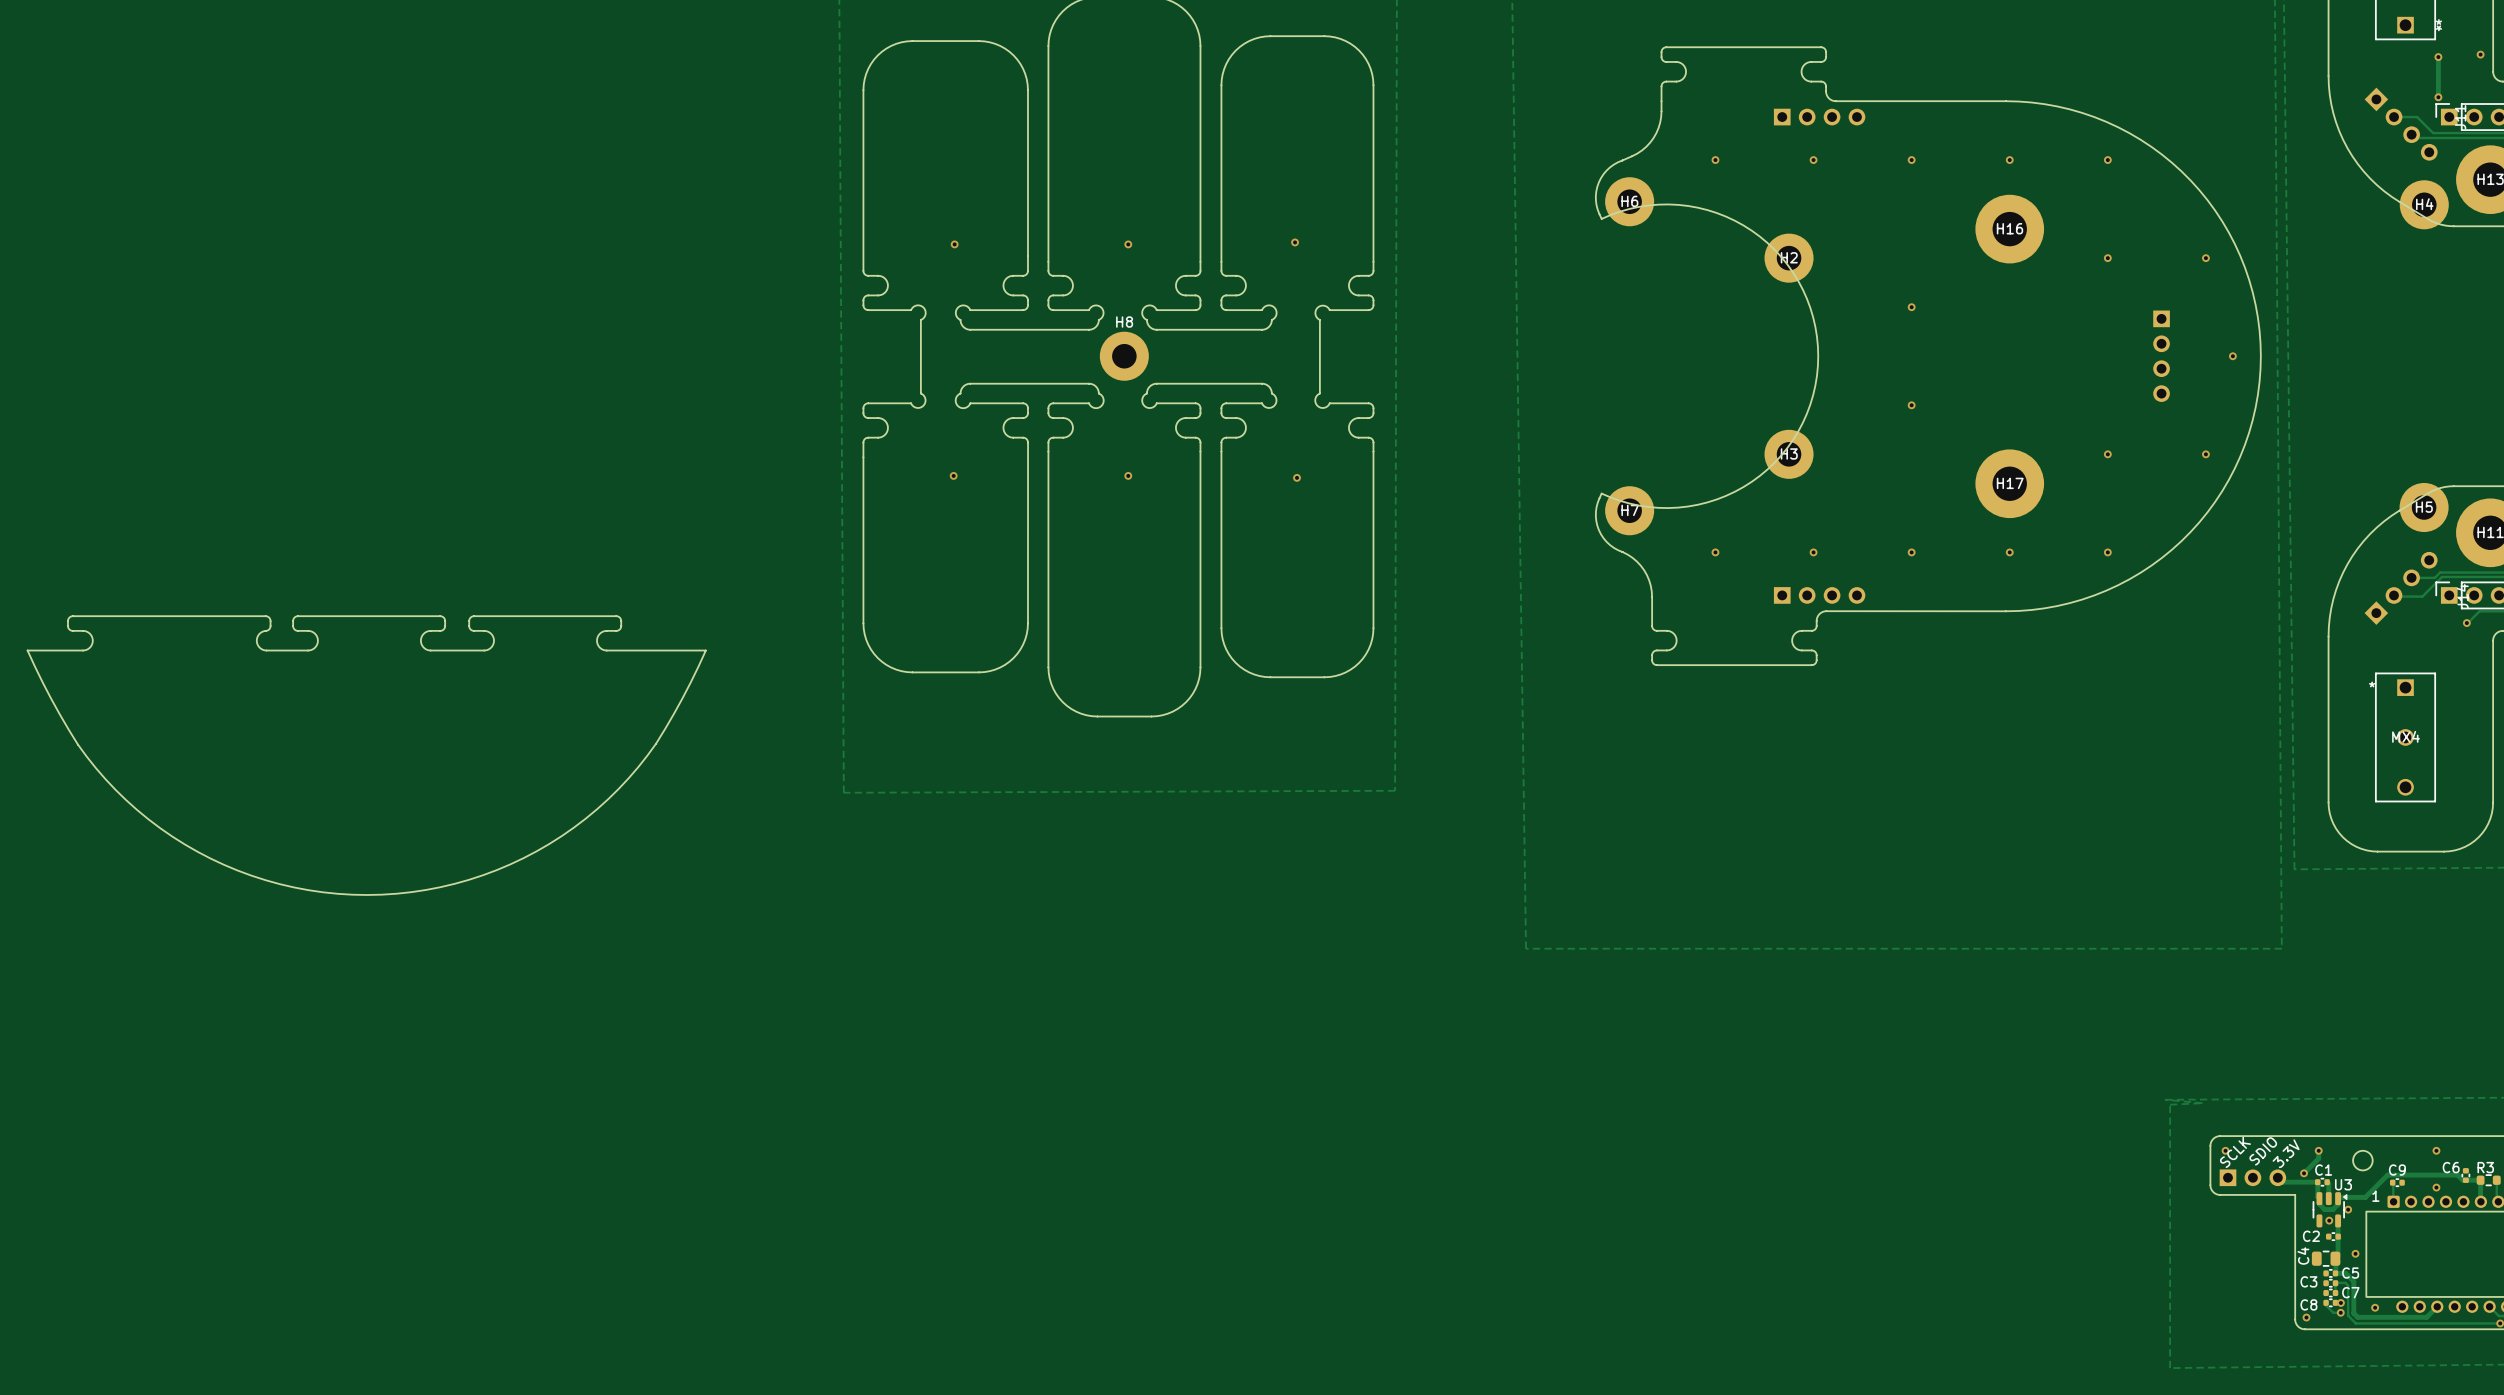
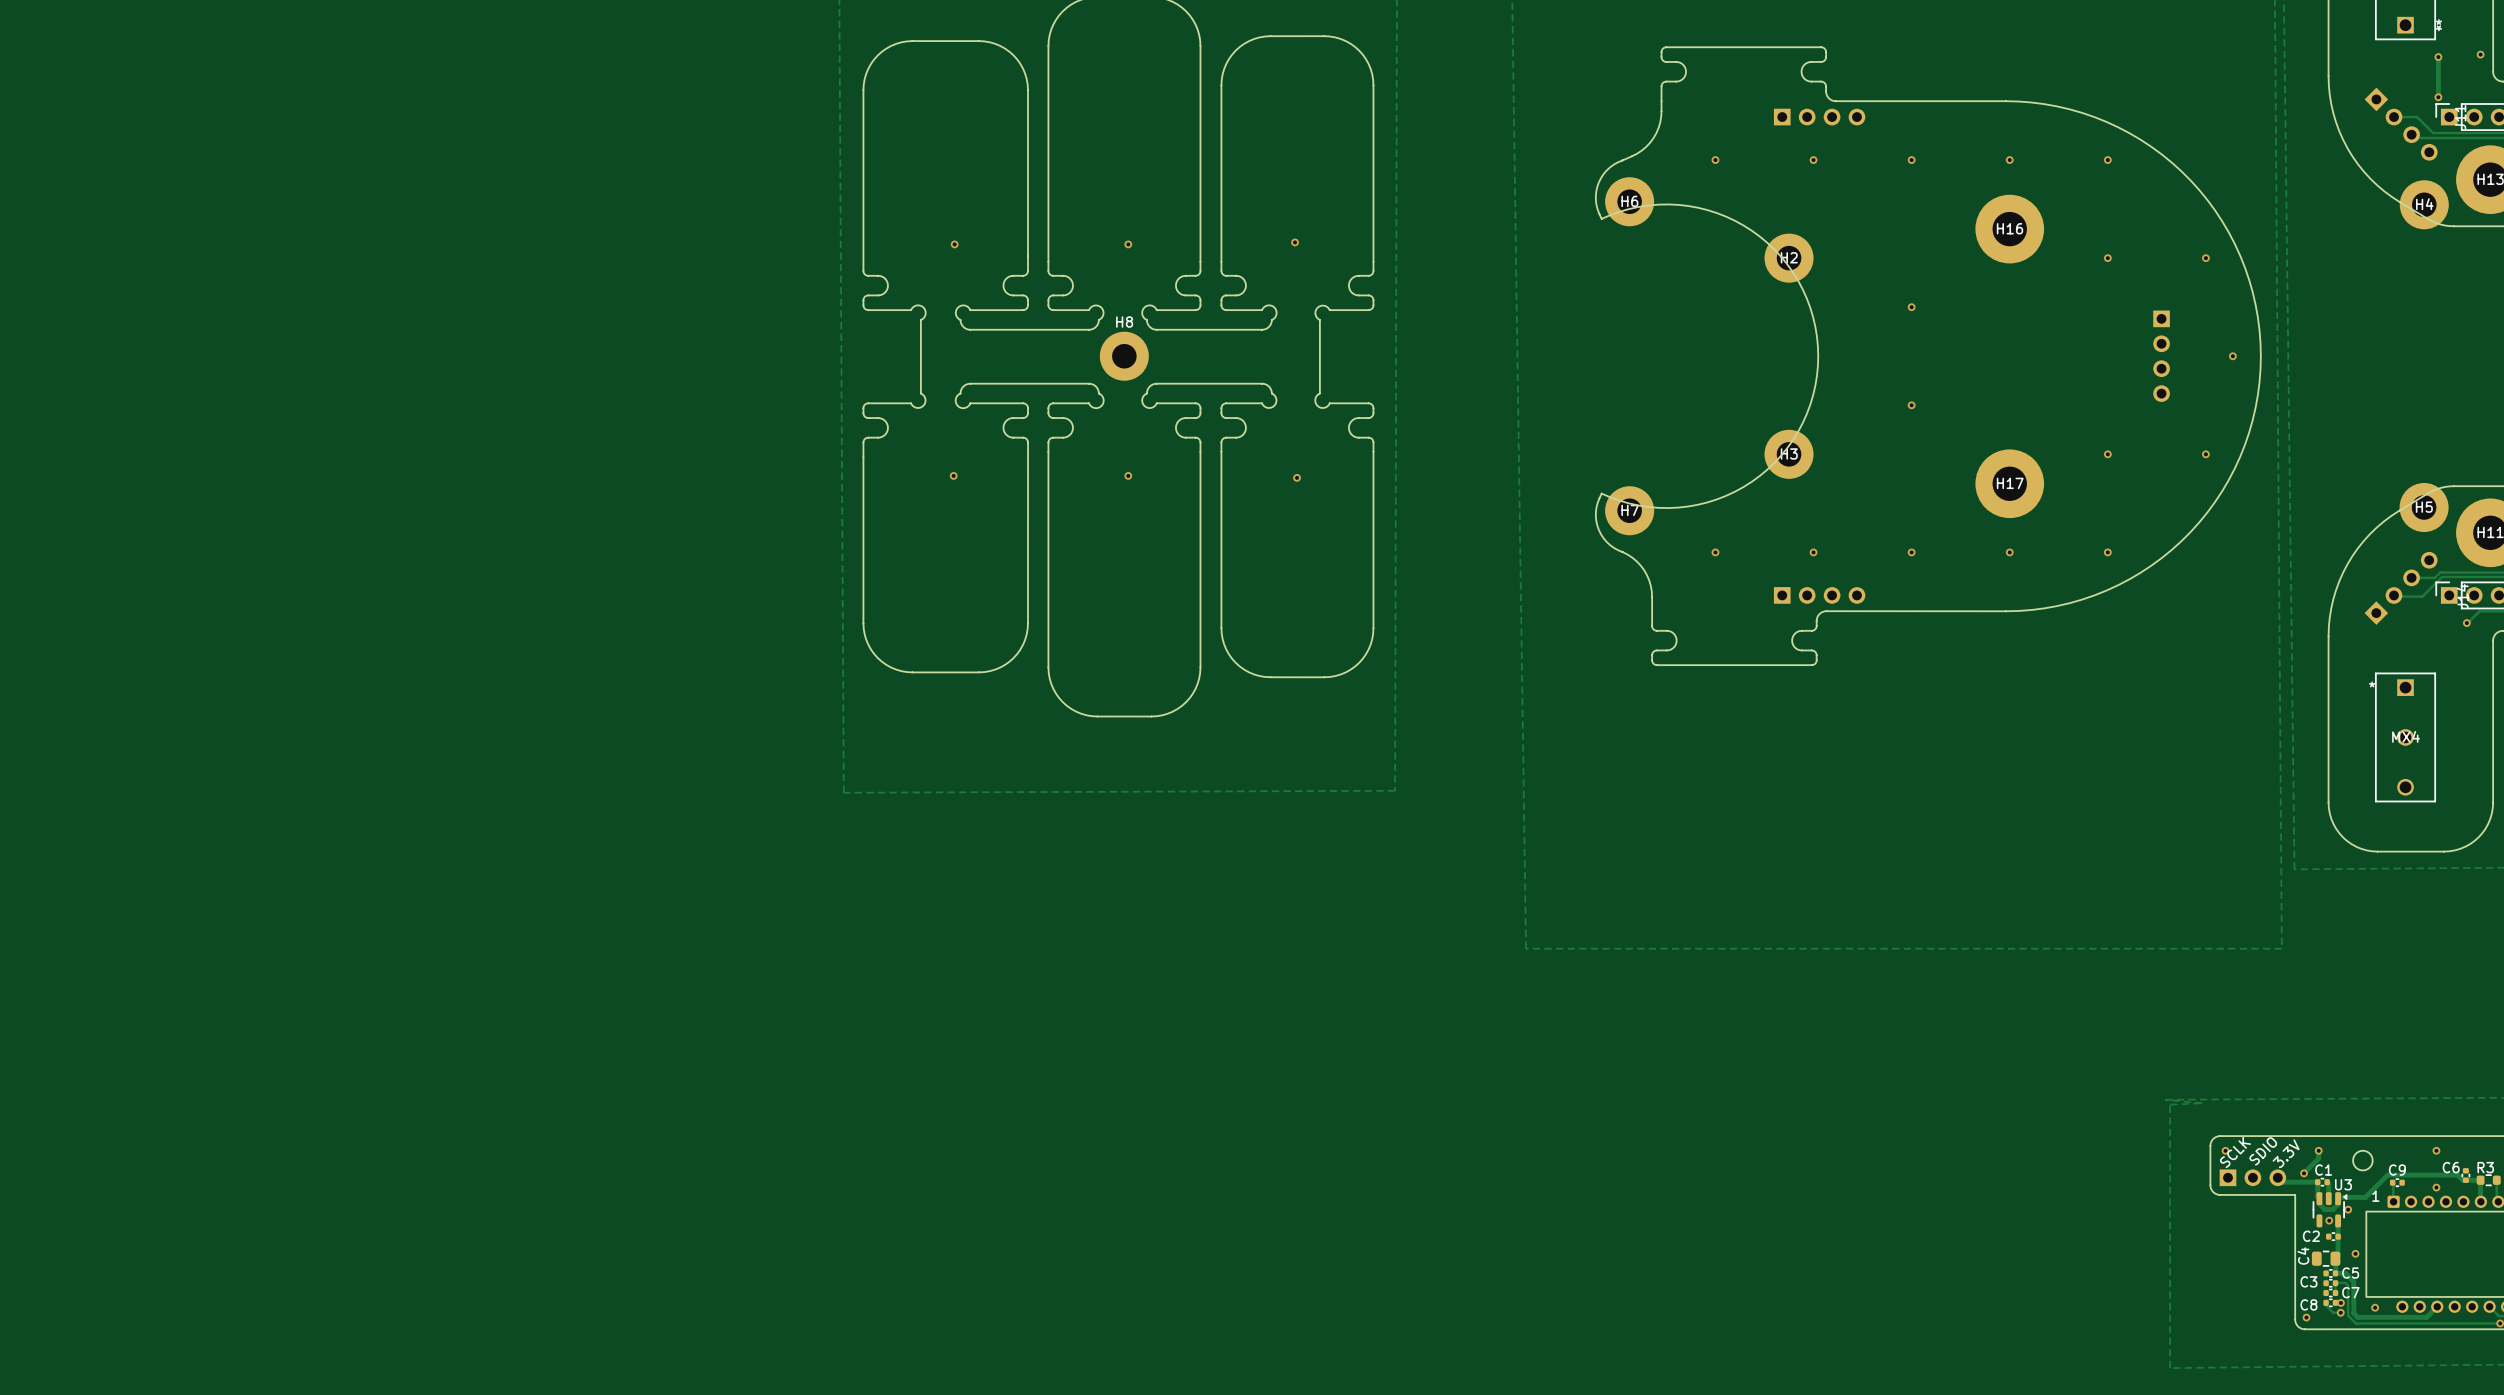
board edge: (72, 616) (266, 616) (270, 619) (270, 627) (260, 633) (256, 641) (259, 647) (266, 650) (309, 650) (315, 647) (317, 640) (314, 633) (293, 628) (293, 619) (297, 616) (440, 616) (444, 619) (444, 628) (441, 630) (429, 630) (423, 633) (420, 640) (424, 648) (430, 650) (484, 650) (492, 646) (493, 637) (487, 631) (470, 629) (469, 620) (472, 616) (616, 616) (621, 619) (619, 629) (603, 631) (597, 636) (597, 644) (603, 649) (705, 650) (674, 713) (647, 755) (608, 799) (561, 835) (510, 864) (468, 879) (411, 892) (352, 894) (323, 892) (279, 884) (224, 864) (172, 836) (148, 819) (115, 789) (78, 744) (51, 698) (27, 650) (82, 650) (88, 648) (92, 641) (90, 634) (85, 631) (71, 630) (68, 628) (68, 619) (72, 616) -> none

